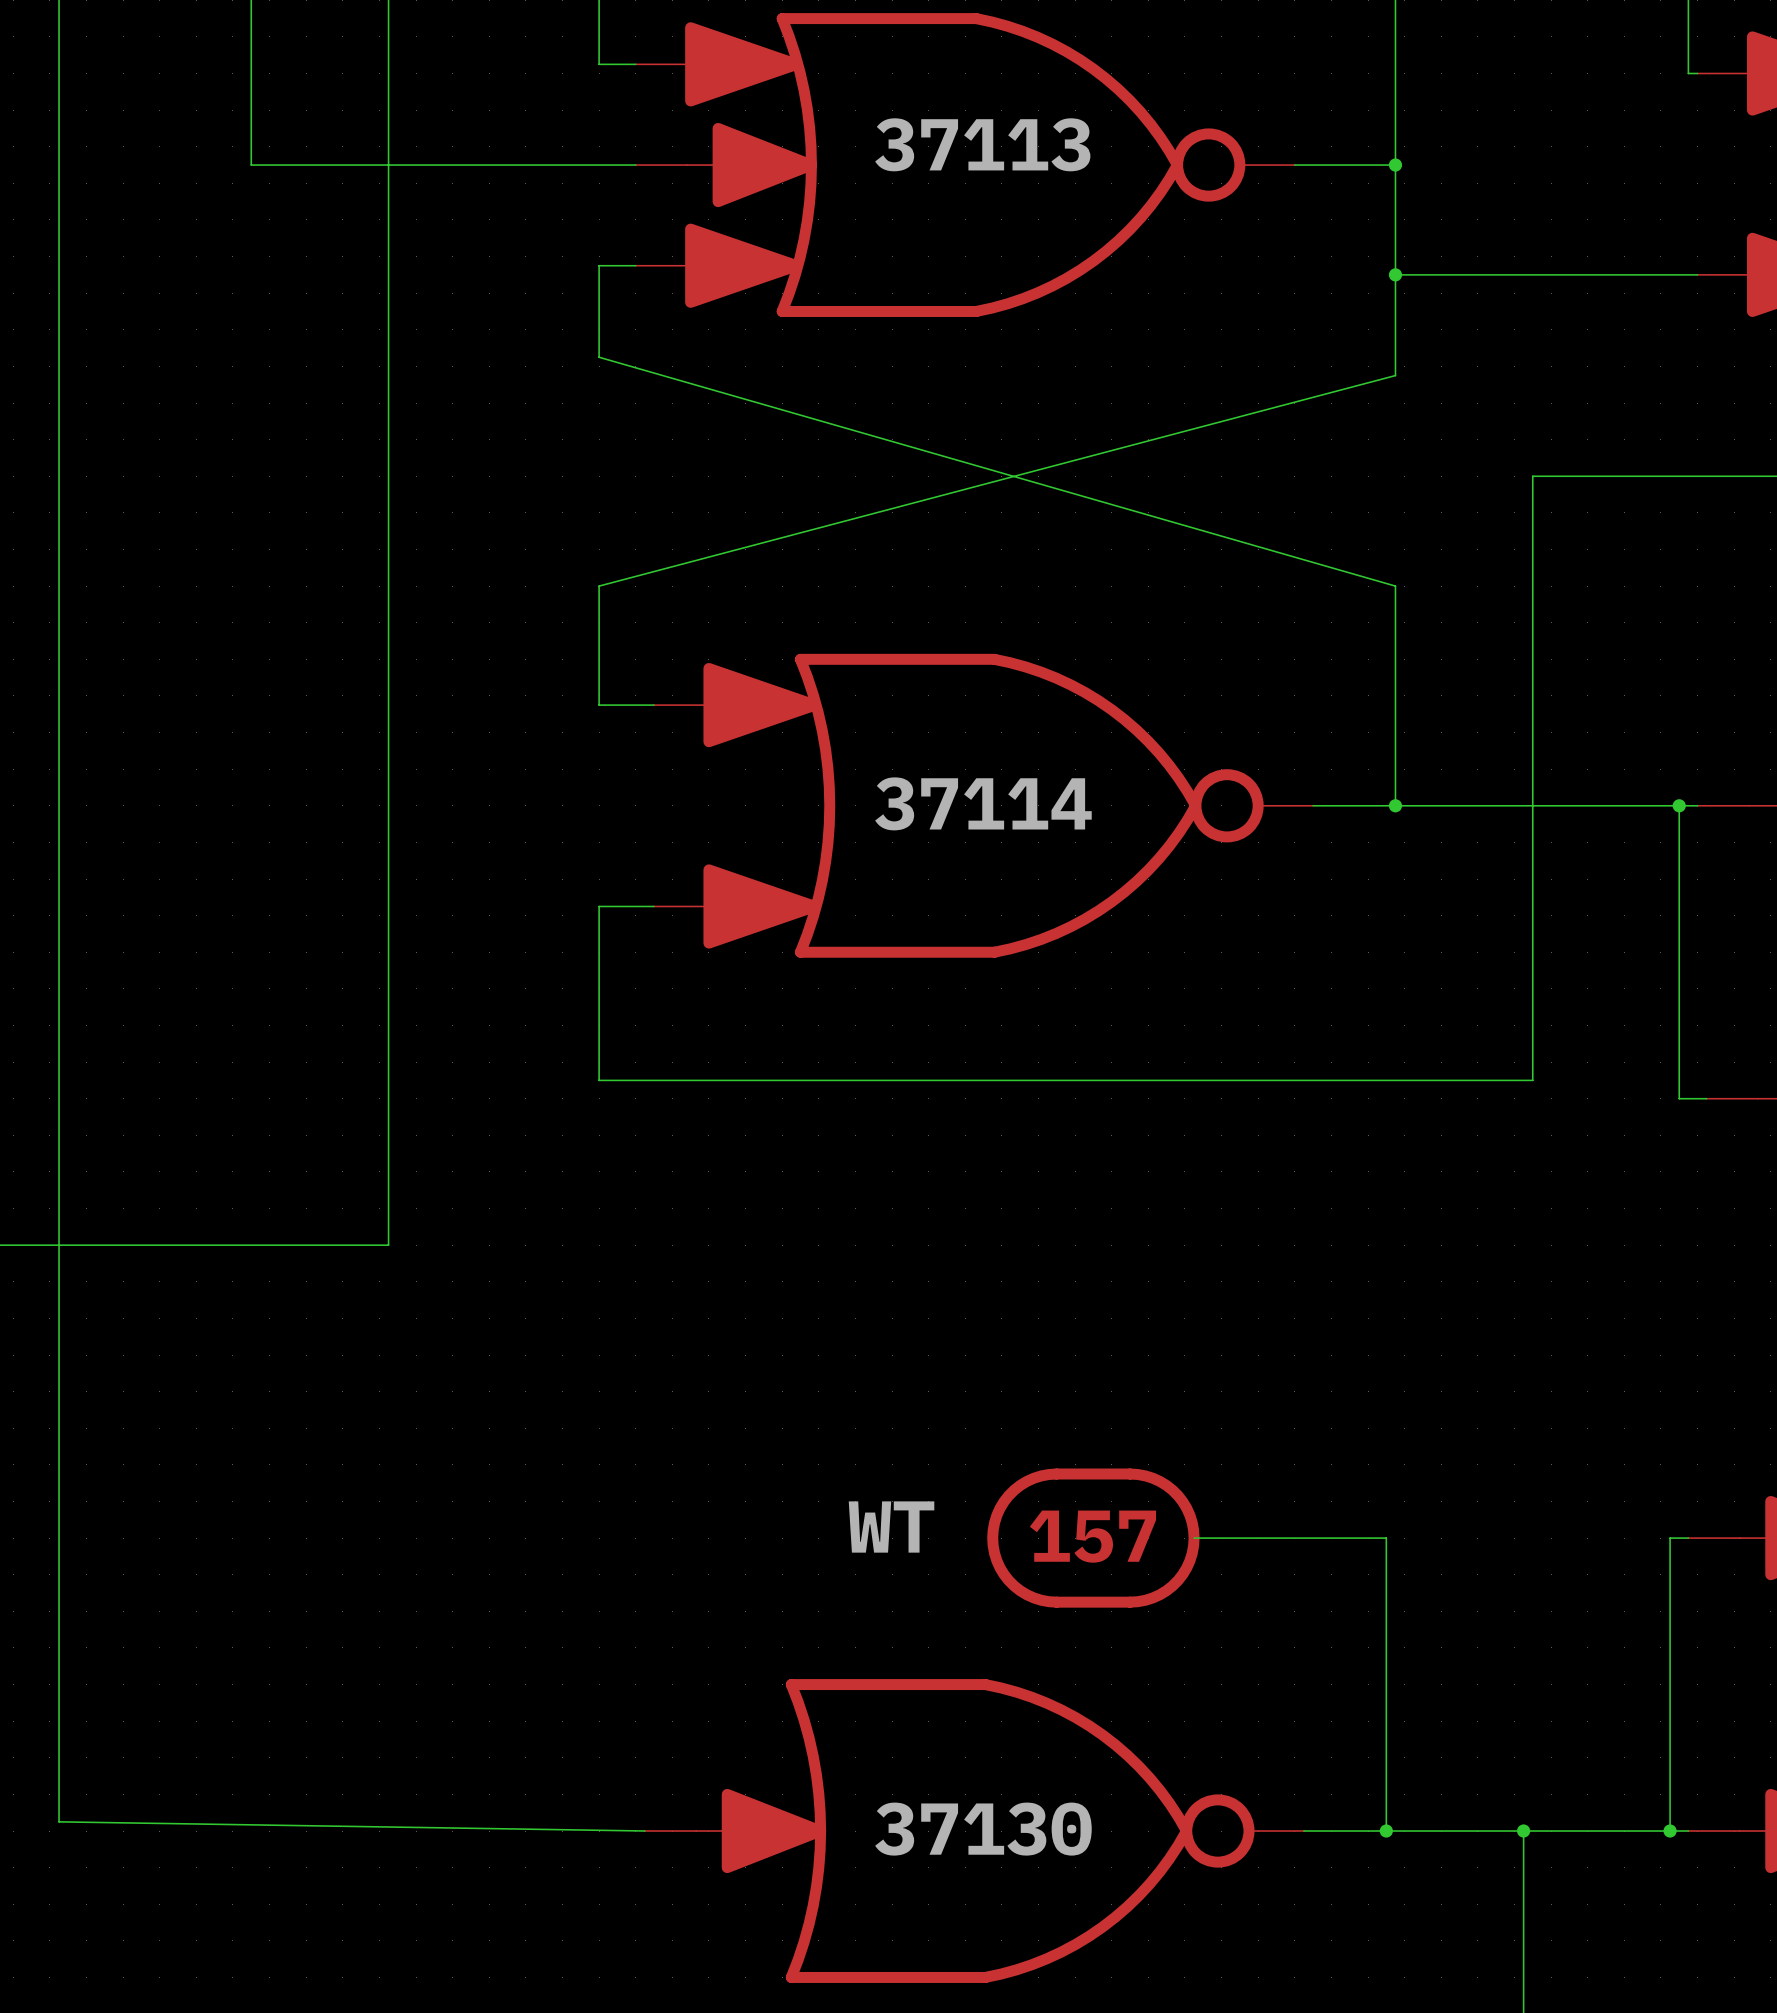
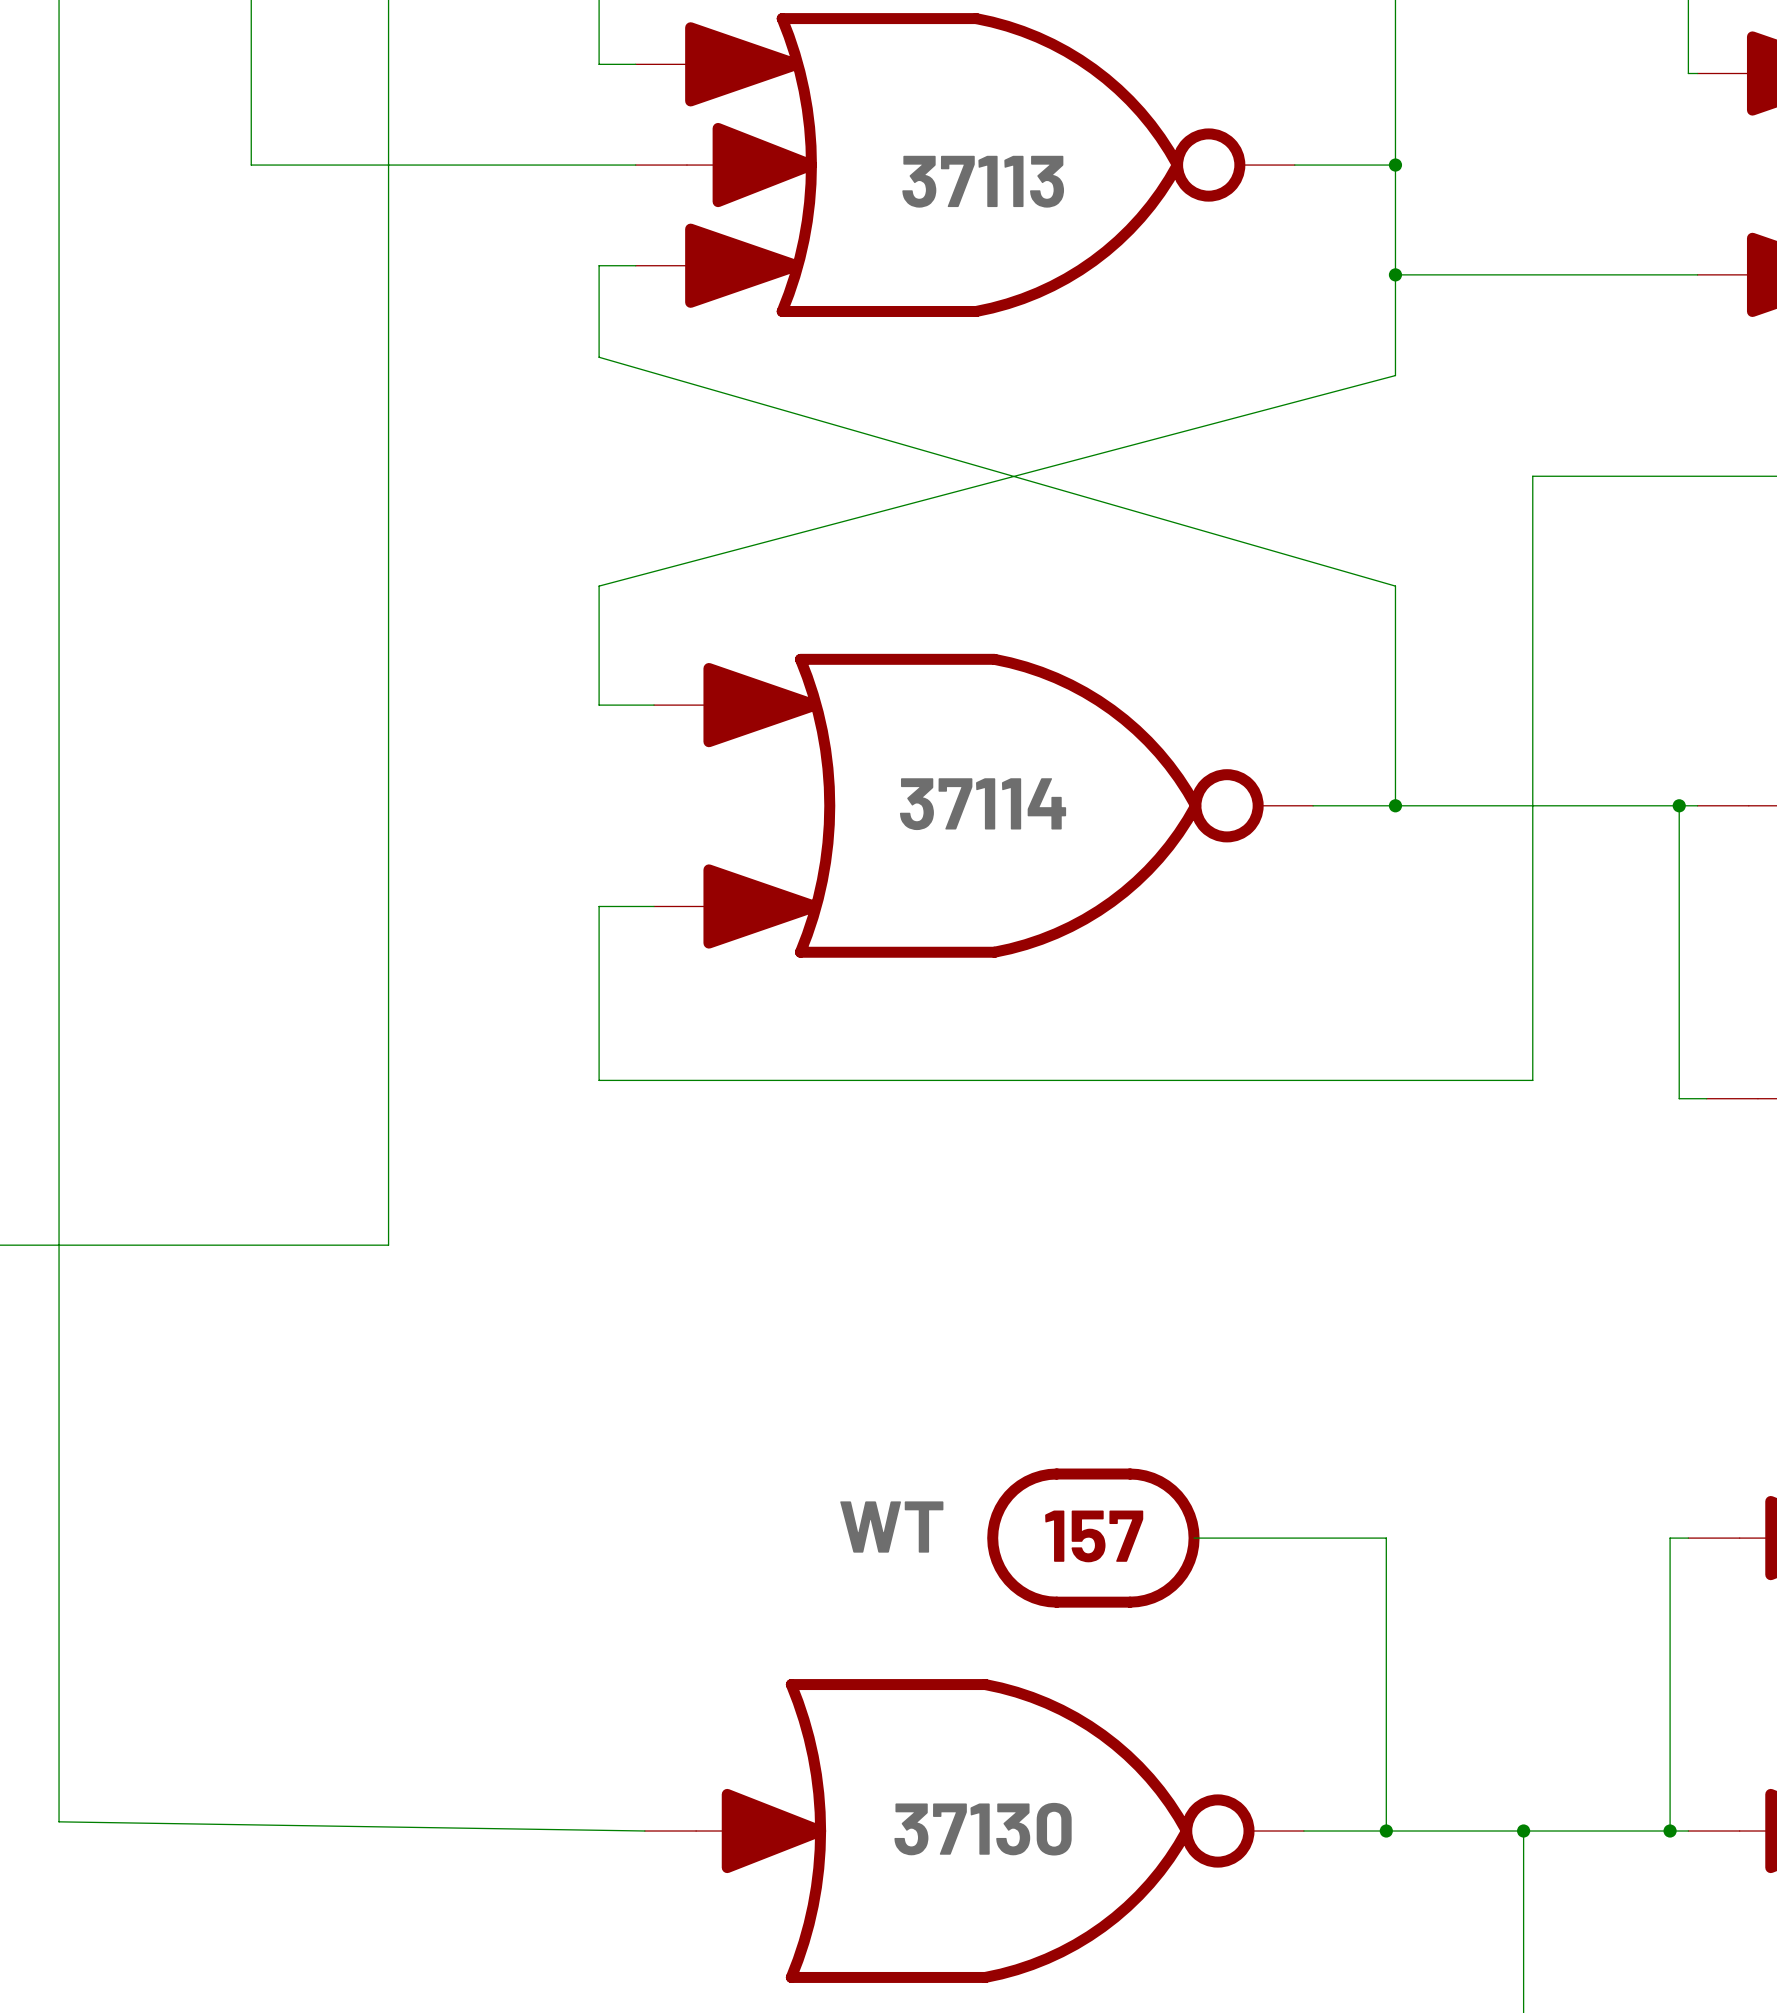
part text position: 37113 (982, 144) -> 37113 (983, 181)

